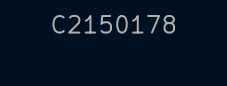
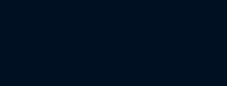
text: C2150178 (113, 24) -> none

